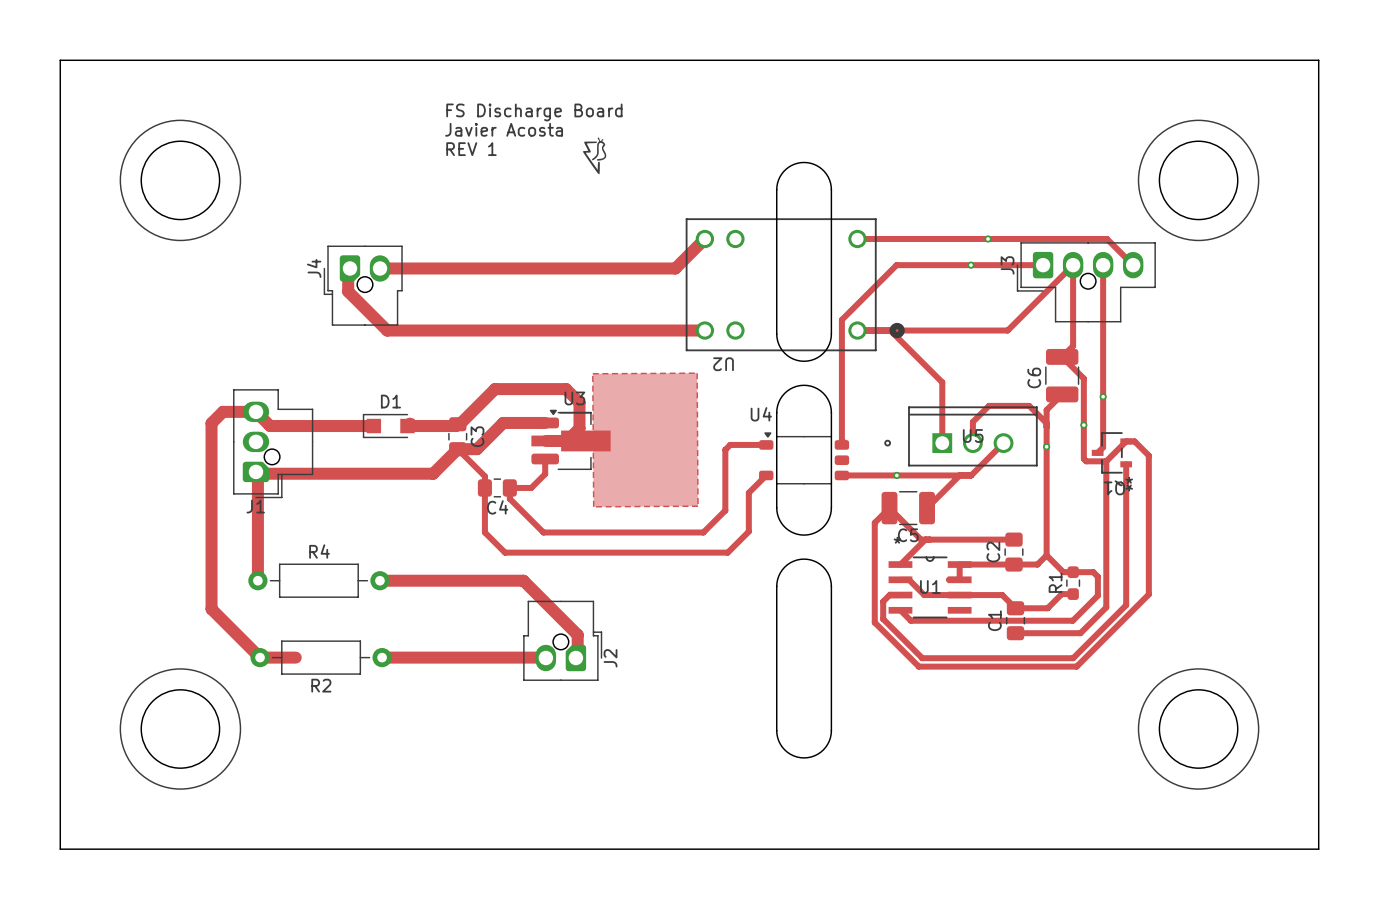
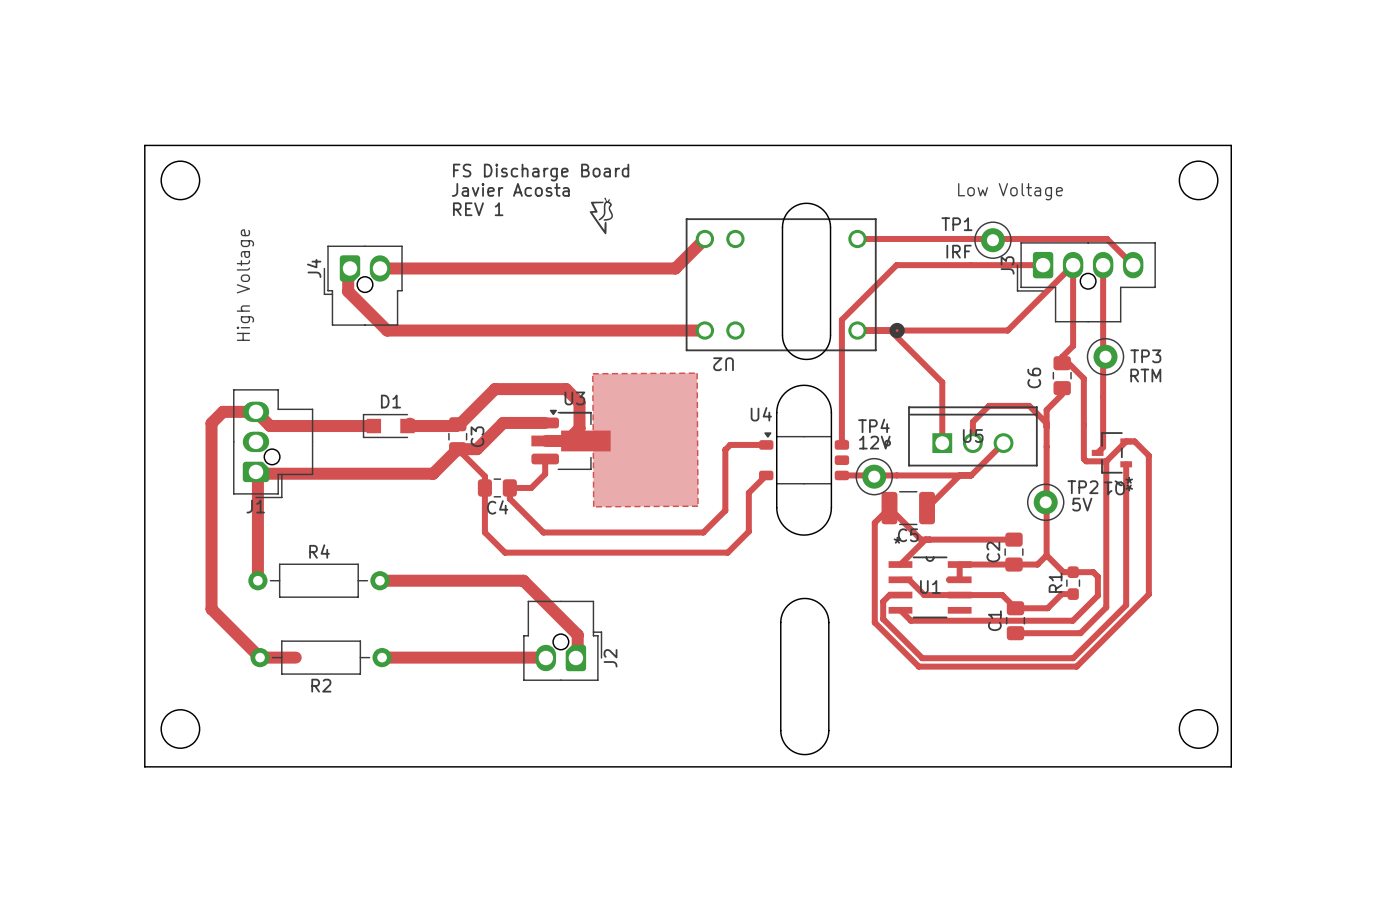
board edge: (60, 60) (1318, 60) (1318, 849) (60, 849) (60, 60) -> (144, 145) (144, 766) (1231, 766) (1231, 145) (144, 145)
text position: FS Discharge Board (534, 112) -> FS Discharge Board (541, 172)
drawing: [119, 119, 242, 242] -> none
drawing: [1137, 119, 1260, 242] -> none
text position: Javier Acosta (504, 129) -> Javier Acosta (510, 189)
round board edge size: [140, 140, 221, 221] -> [160, 160, 201, 201]
round board edge size: [1158, 140, 1239, 221] -> [1178, 160, 1219, 201]
text position: REV 1 (471, 149) -> REV 1 (478, 209)
drawing position: (594, 155) -> (601, 216)
board edge: (776, 189) (776, 337) (780, 347) (787, 355) (796, 360) (807, 361) (823, 353) (831, 337) (831, 186) (828, 177) (822, 169) (813, 164) (804, 162) (791, 165) (783, 171) (778, 180) (776, 189) -> (782, 227) (783, 341) (786, 349) (792, 355) (800, 358) (812, 358) (824, 351) (830, 338) (829, 221) (821, 208) (812, 204) (803, 203) (789, 210) (784, 218) (782, 227)
text: none -> Low Voltage (1010, 191)
via: (988, 238) -> none
TP1: none -> IRF (992, 240)
via: (970, 265) -> none
text: none -> High Voltage (245, 285)
C6 footprint: [1045, 348, 1080, 403] -> [1052, 356, 1072, 396]
TP3: none -> (1105, 356)
via: (1103, 396) -> none
via: (1083, 425) -> none
via: (1046, 446) -> none
via: (896, 475) -> none
TP4: none -> 12V (874, 476)
TP2: none -> 5V (1045, 502)
board edge: (776, 586) (776, 734) (780, 744) (787, 752) (796, 756) (807, 757) (823, 749) (831, 734) (831, 582) (823, 567) (814, 561) (804, 559) (793, 561) (784, 567) (778, 575) (776, 586) -> (780, 622) (781, 736) (785, 745) (792, 751) (801, 754) (811, 753) (821, 747) (828, 733) (827, 616) (819, 603) (811, 599) (801, 598) (787, 605) (782, 613) (780, 622)
drawing: [119, 668, 242, 790] -> none
drawing: [1137, 668, 1260, 790] -> none
round board edge size: [140, 689, 221, 769] -> [160, 709, 201, 749]
round board edge size: [1158, 689, 1239, 769] -> [1178, 709, 1219, 749]

